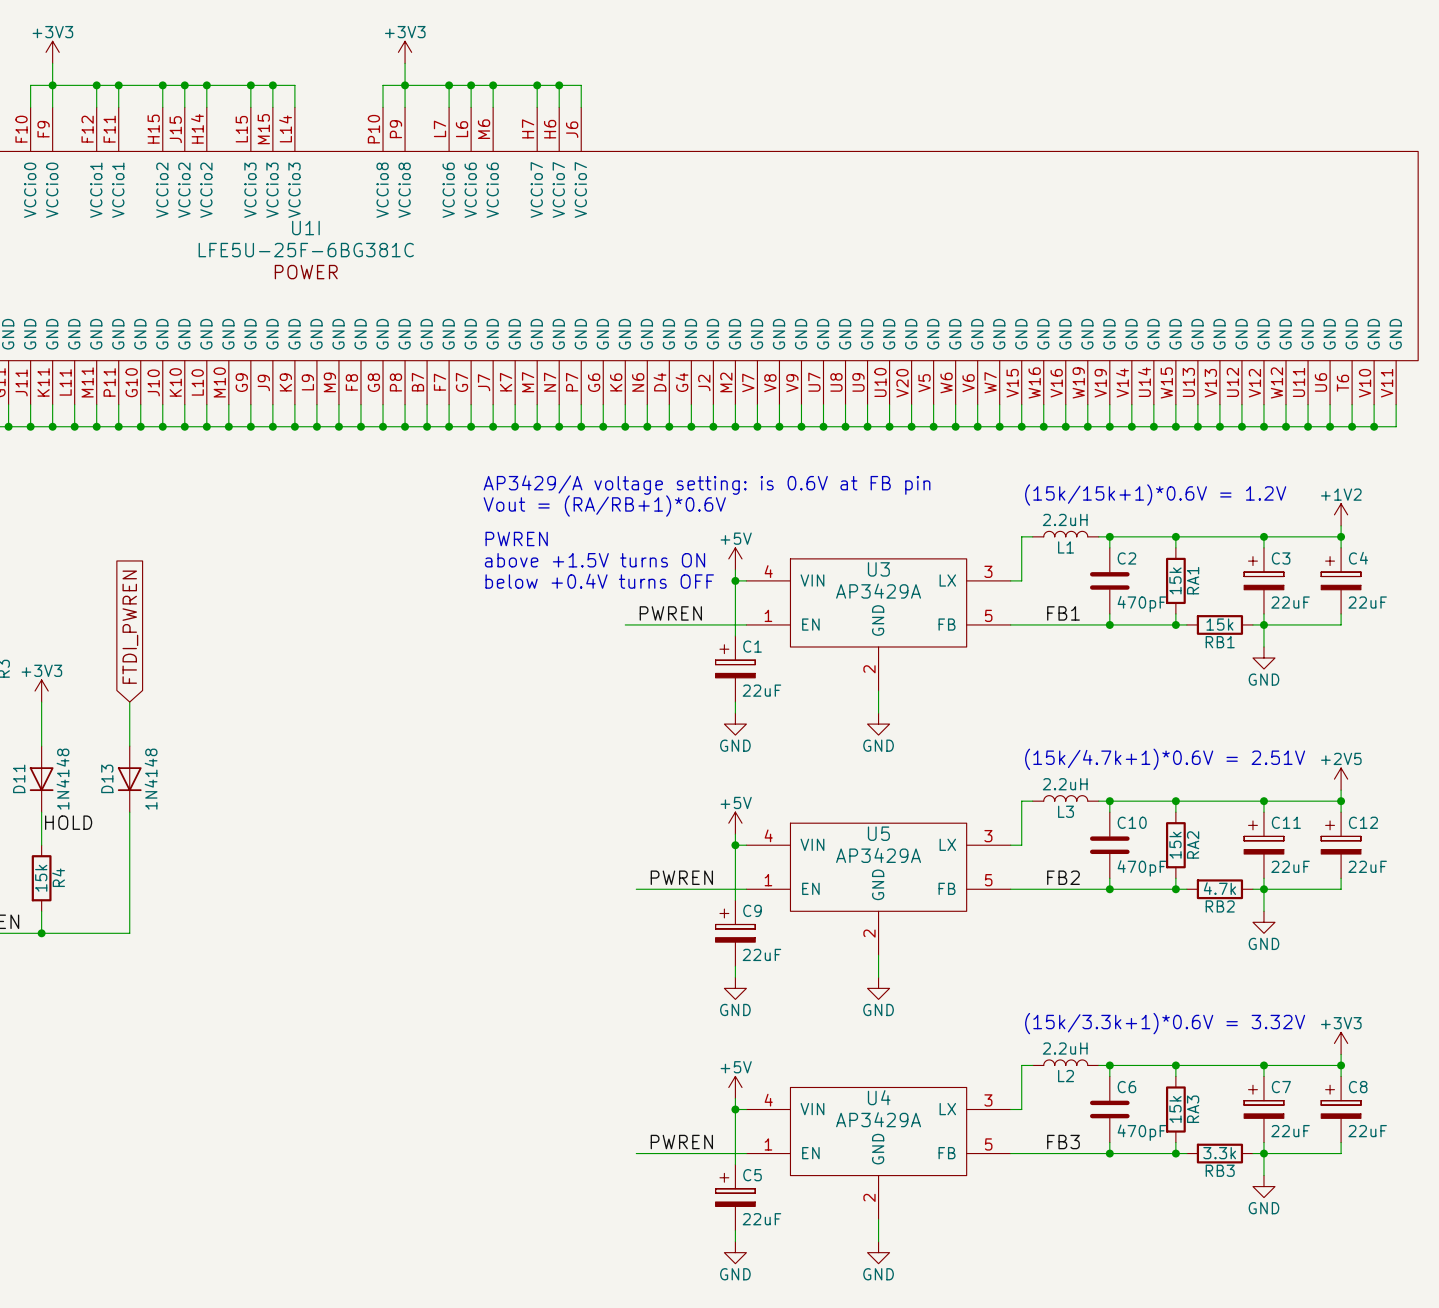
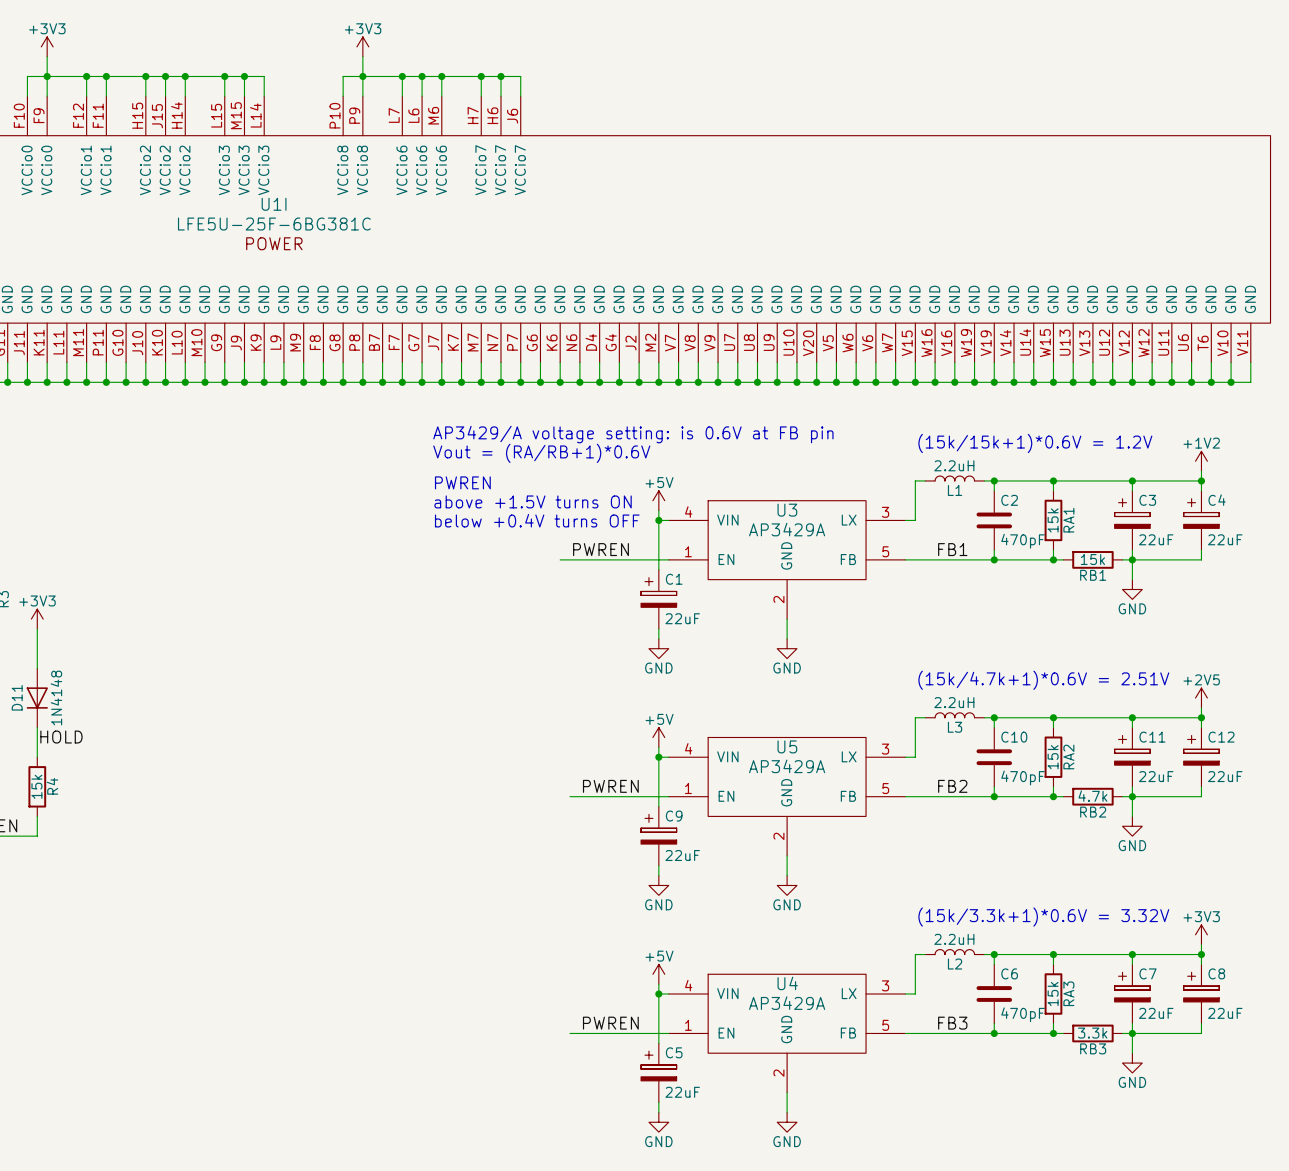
global label: FTDI_PWREN (130, 627) -> none
wire: (129, 702) (129, 746) -> none
D13: 1N4148 (129, 779) -> none
wire: (129, 812) (129, 933) (41, 933) -> none
junction: (41, 933) -> none

